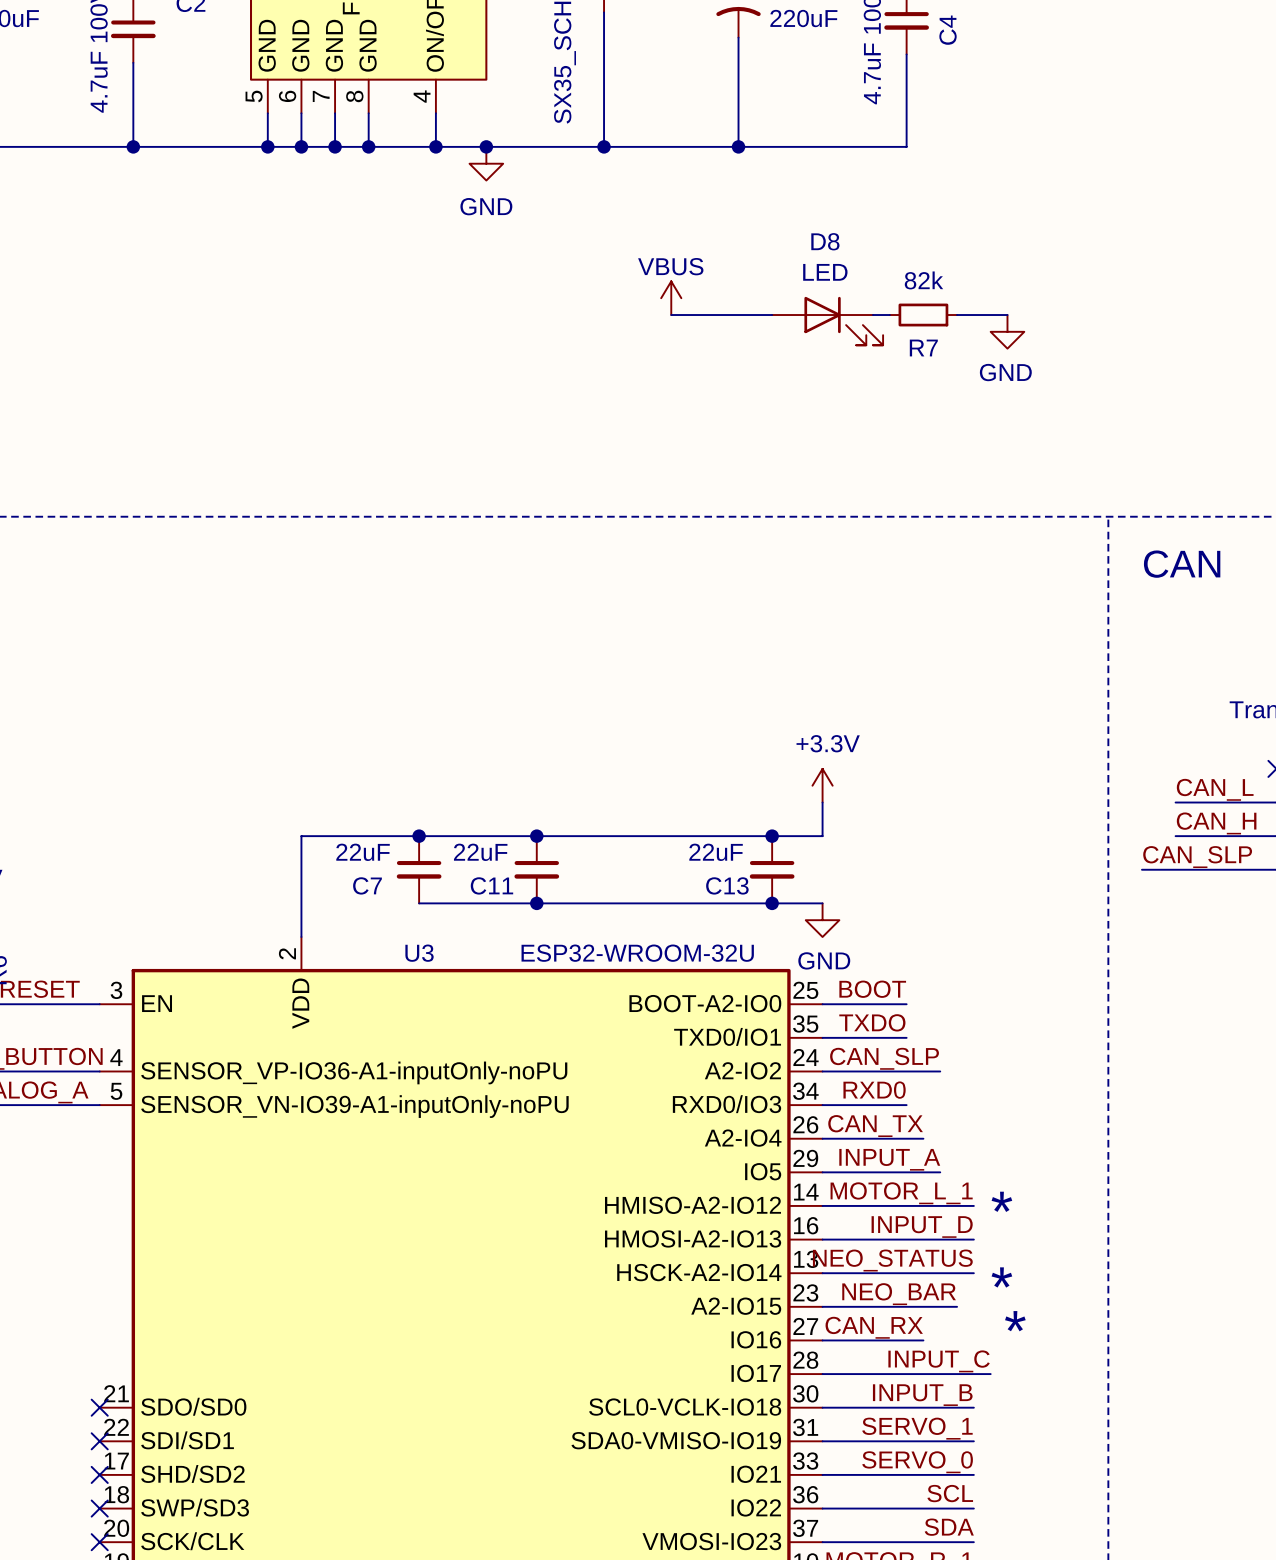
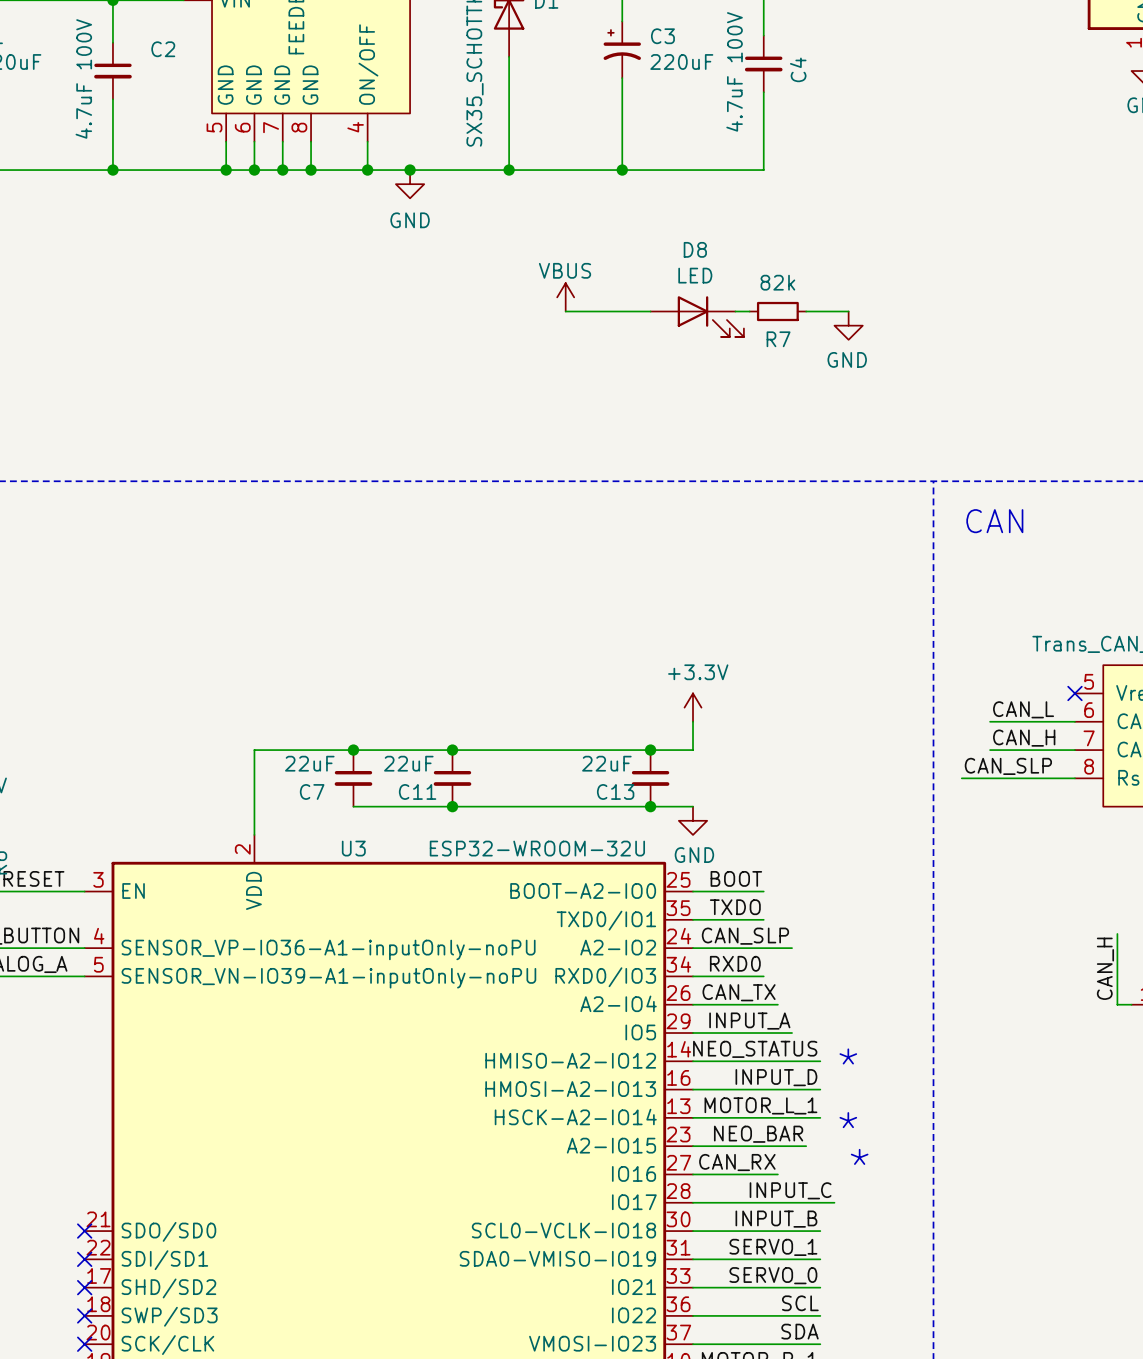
label: MOTOR_L_1 (901, 1193) -> NEO_STATUS (755, 1049)
label: NEO_STATUS (892, 1260) -> MOTOR_L_1 (760, 1105)

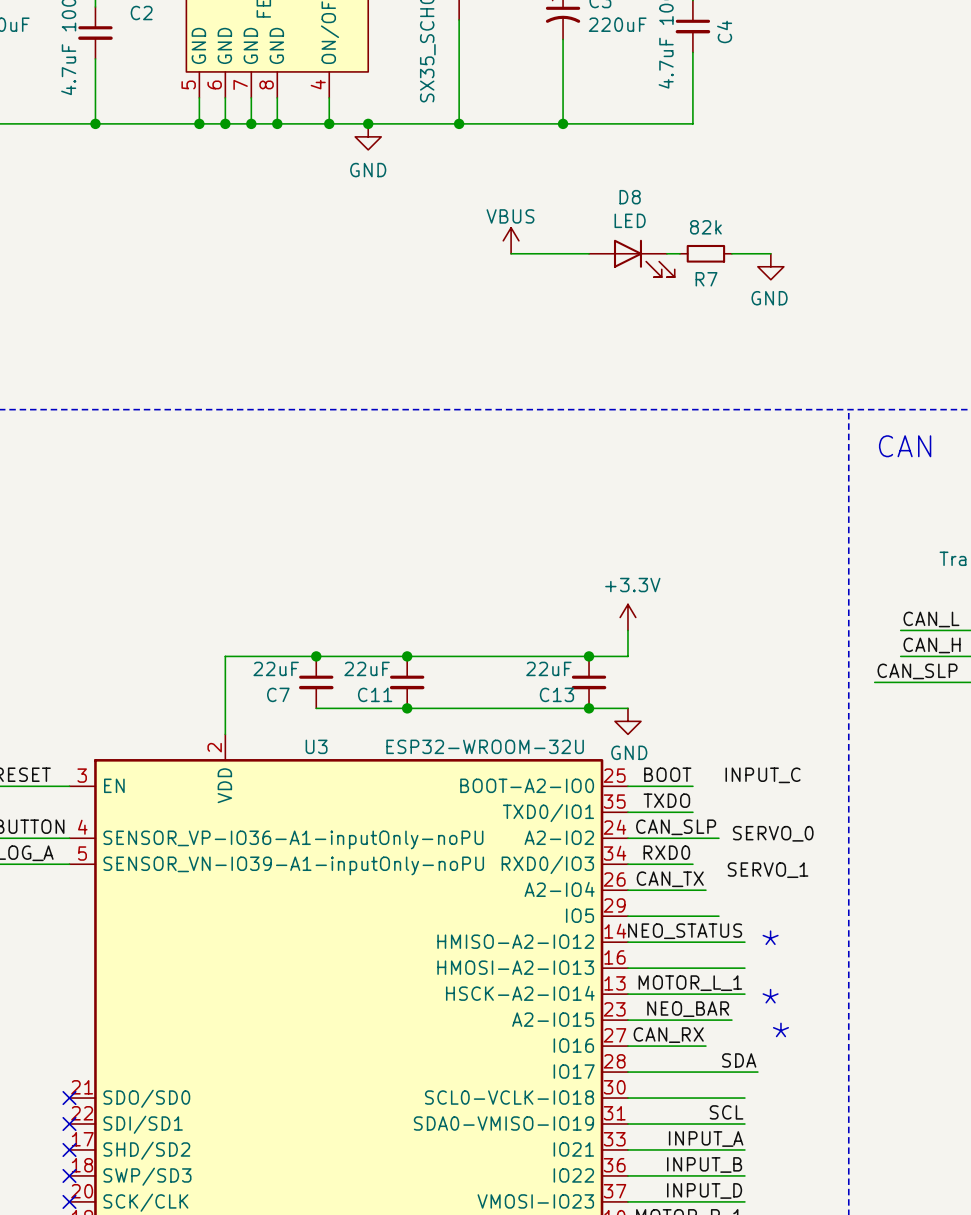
label: none -> INPUT_C (763, 775)
label: none -> SERVO_0 (773, 833)
label: none -> SERVO_1 (768, 870)
label: INPUT_A (749, 1021) -> none
label: INPUT_D (776, 1077) -> none
label: INPUT_C (790, 1190) -> SDA (739, 1060)
label: INPUT_B (776, 1219) -> none
label: SERVO_1 (773, 1247) -> SCL (726, 1112)
label: SERVO_0 (773, 1275) -> INPUT_A (706, 1139)
label: SCL (800, 1303) -> INPUT_B (704, 1164)
label: SDA (800, 1331) -> INPUT_D (704, 1190)

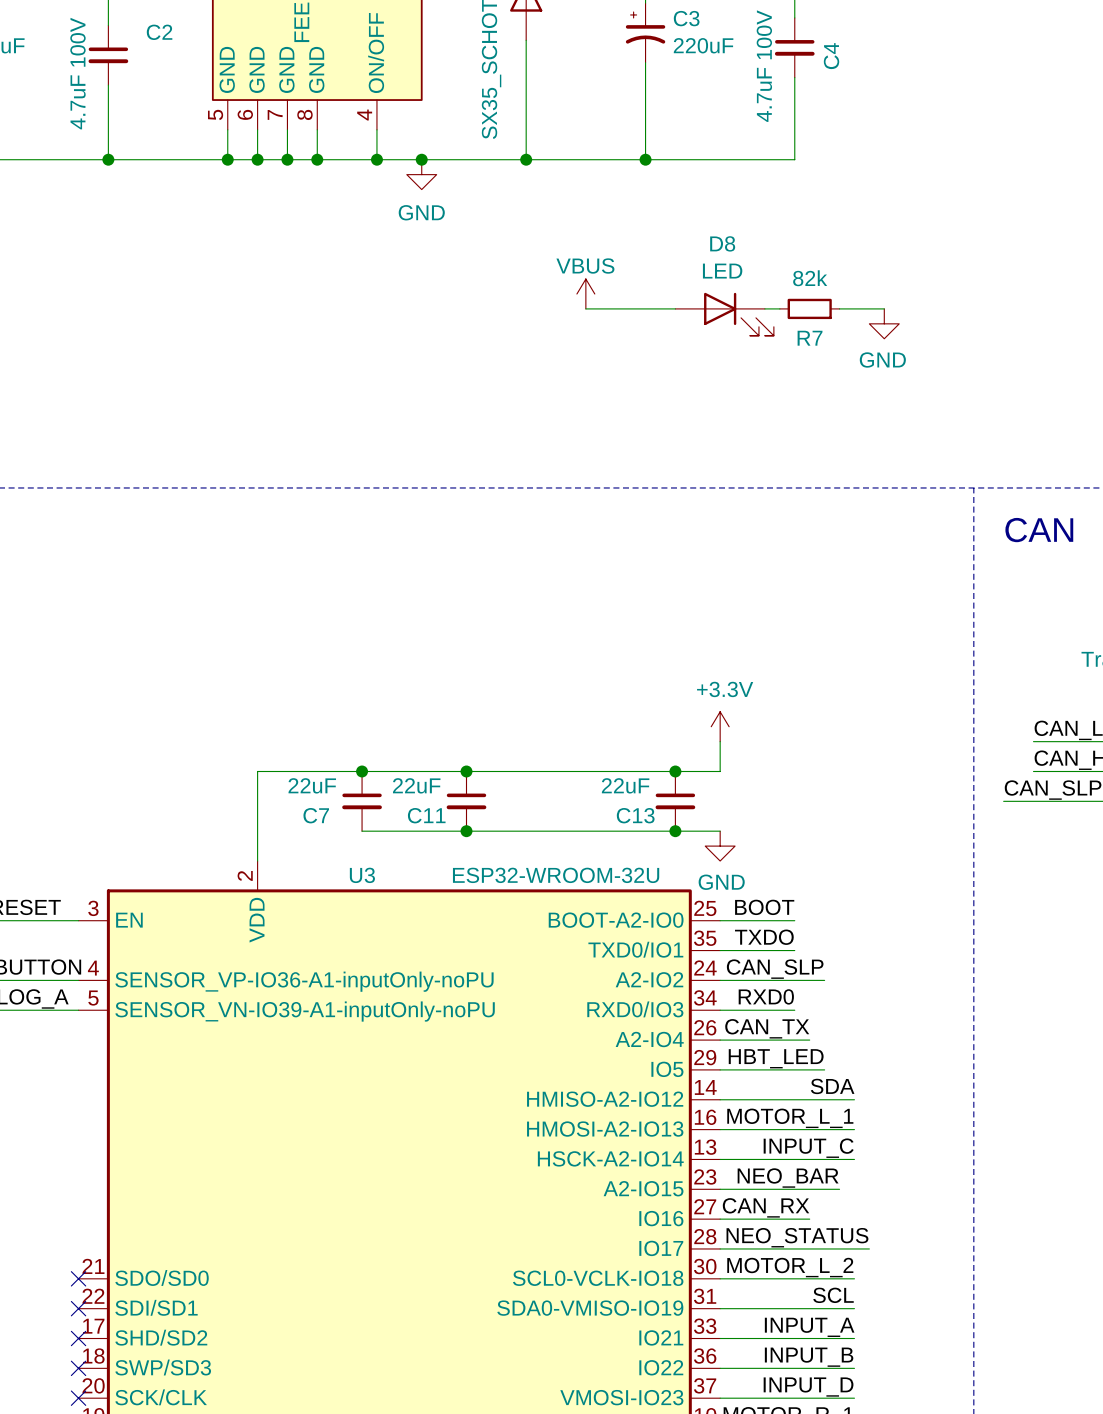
label: INPUT_C (763, 775) -> none
label: SERVO_0 (773, 833) -> none
label: SERVO_1 (768, 870) -> none
label: none -> HBT_LED (776, 1058)
label: NEO_STATUS (685, 931) -> SDA (832, 1086)
text: * (770, 937) -> none
label: none -> MOTOR_L_1 (790, 1118)
label: MOTOR_L_1 (690, 983) -> INPUT_C (808, 1148)
text: * (770, 996) -> none
text: * (780, 1029) -> none
label: SDA (739, 1060) -> NEO_STATUS (797, 1237)
label: none -> MOTOR_L_2 (790, 1267)

